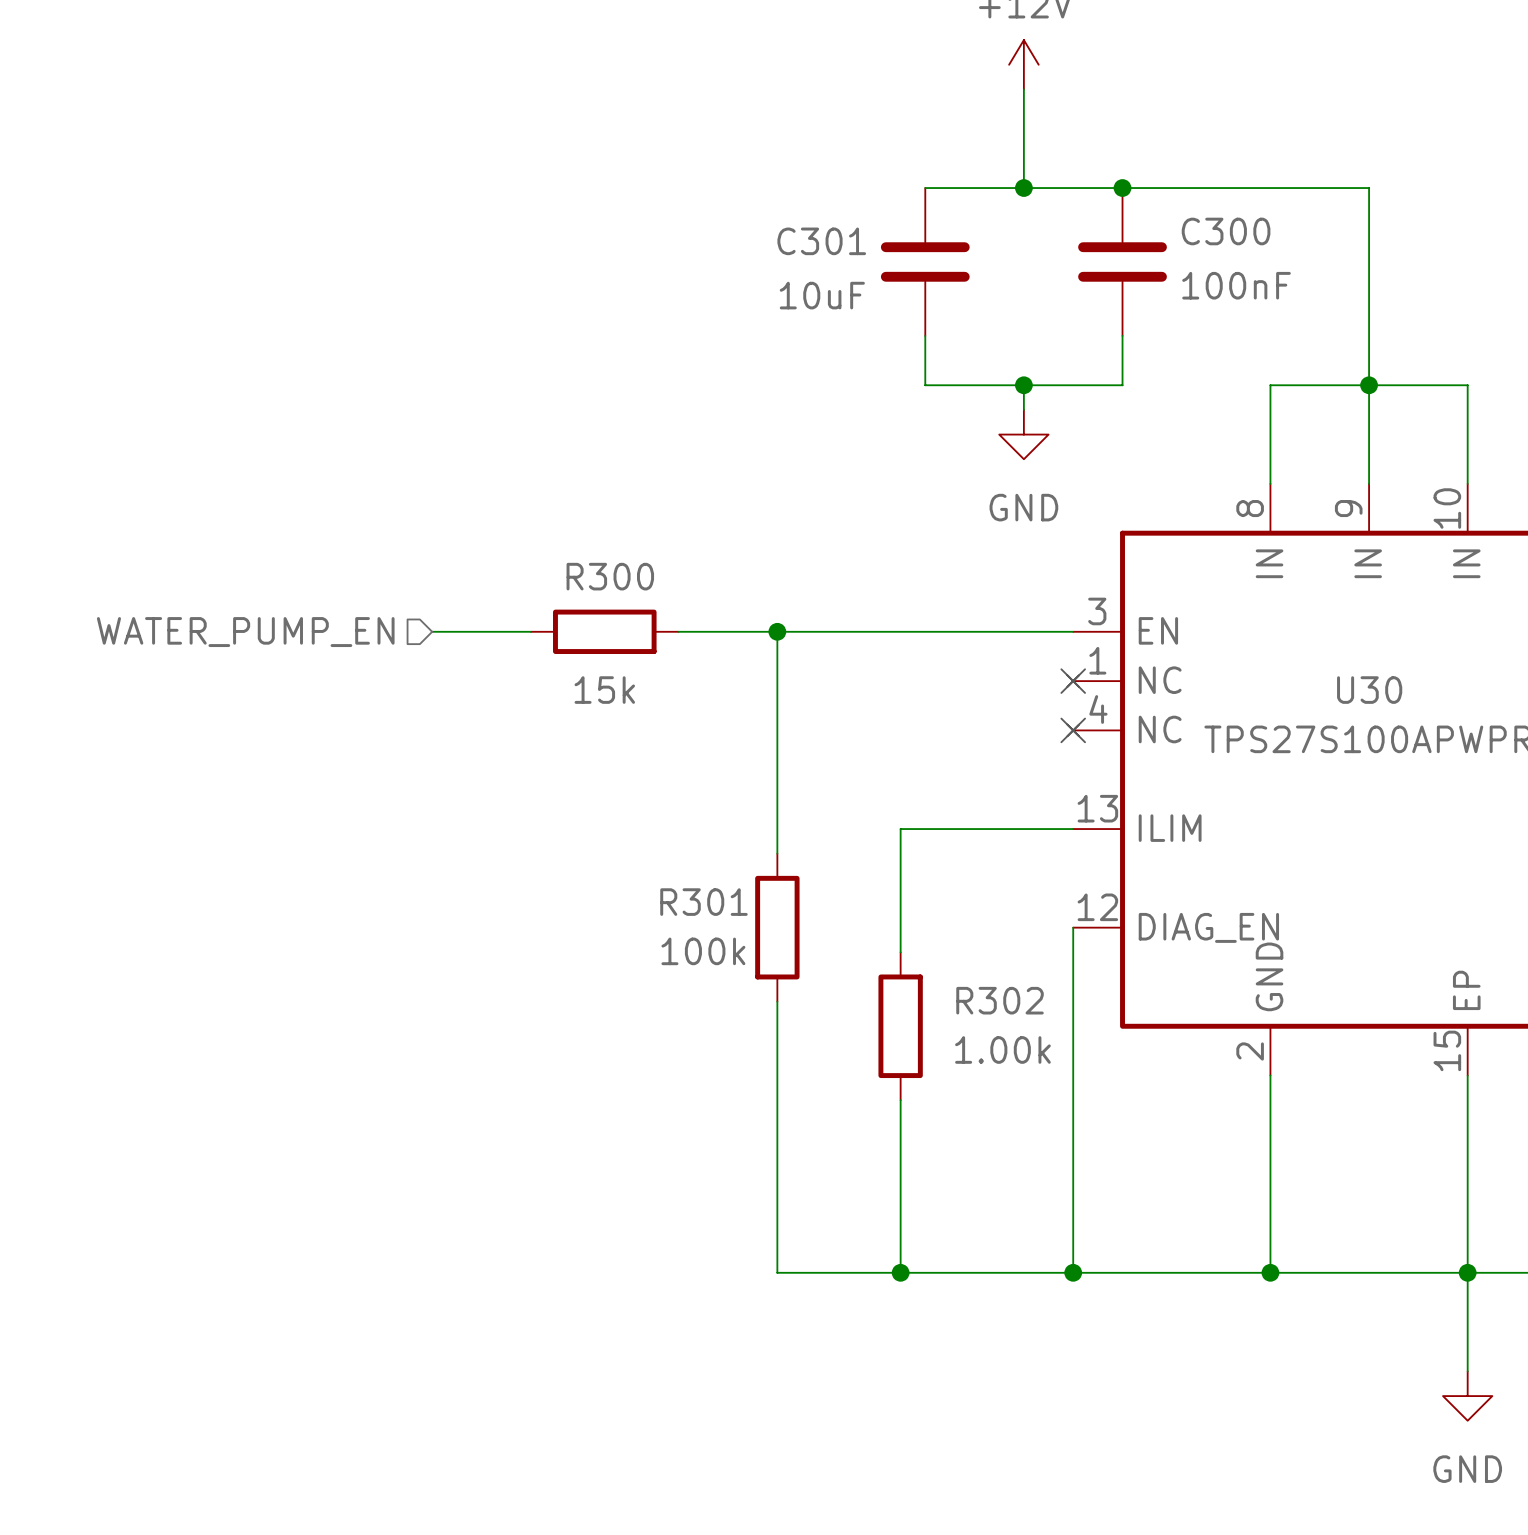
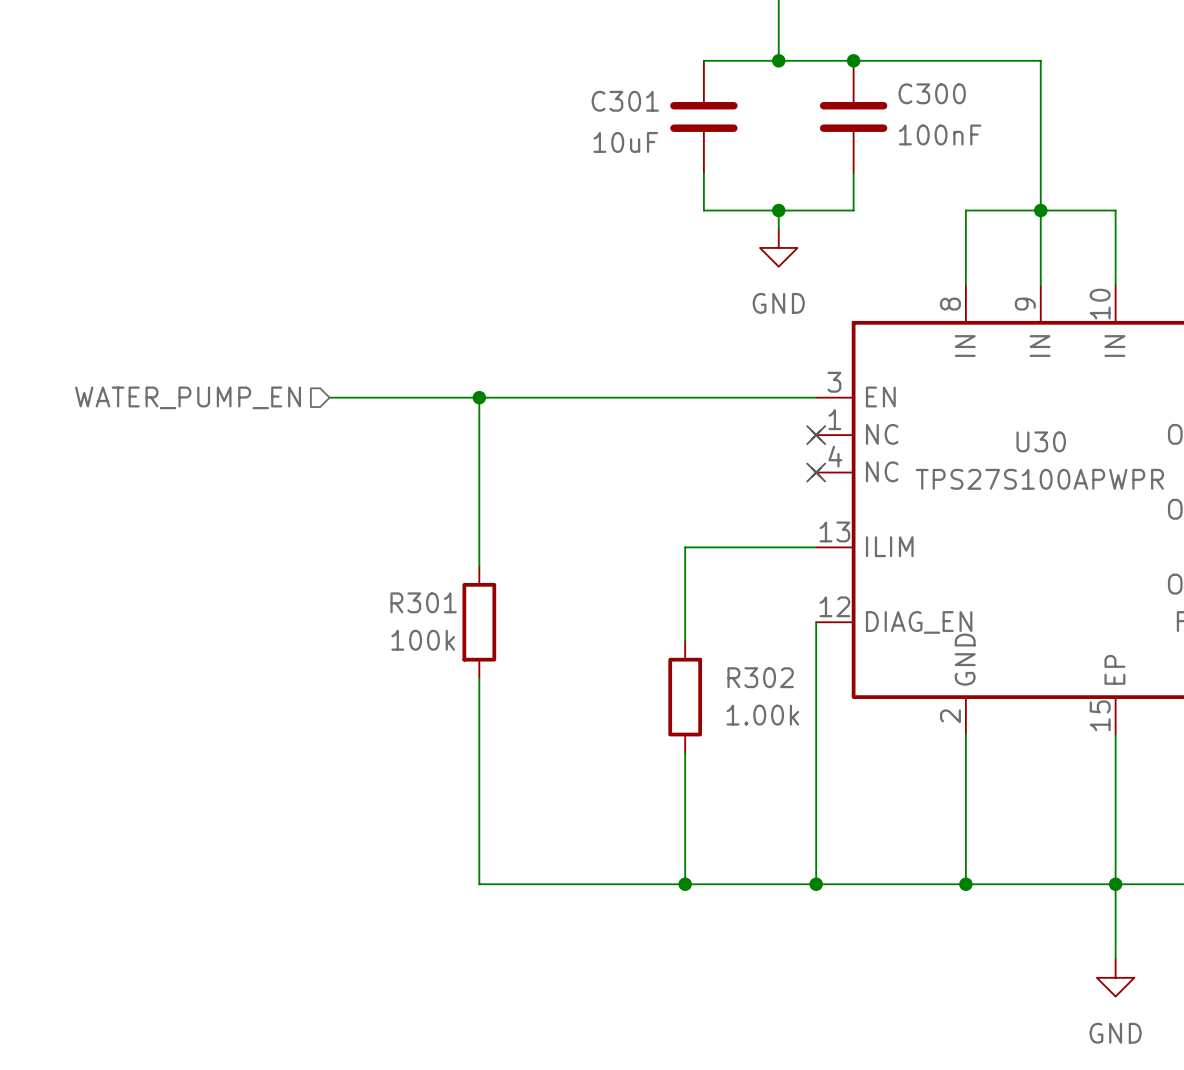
wire: none -> (404, 397) (516, 397)
R300: 15k (604, 631) -> none
junction: none -> (479, 397)
wire: (777, 631) (777, 853) -> (479, 397) (479, 566)
junction: (777, 631) -> none
R301 position: (777, 927) -> (479, 622)
wire: (777, 1001) (777, 1272) -> (479, 678) (479, 884) (591, 884)

